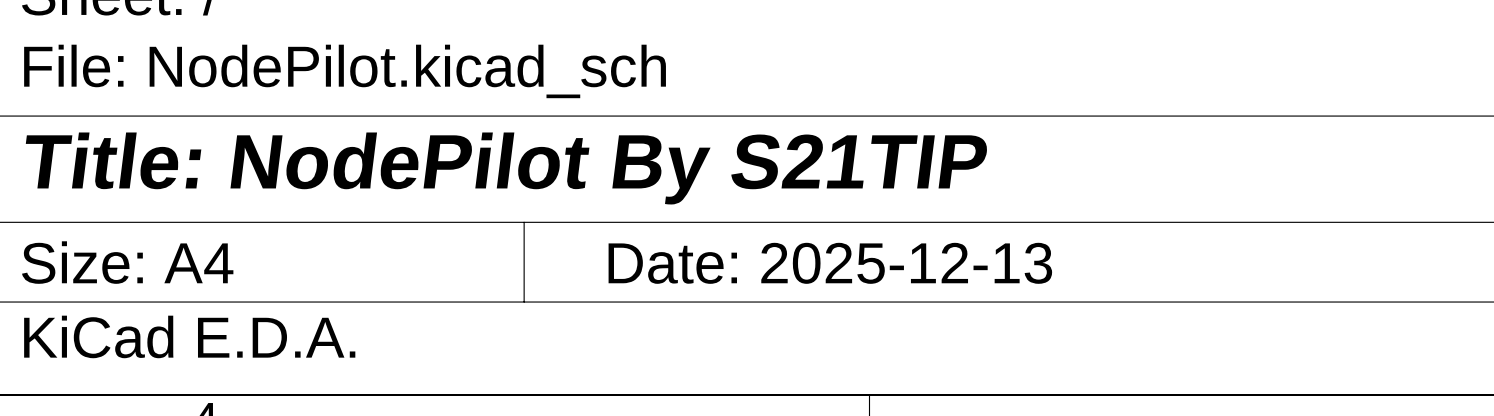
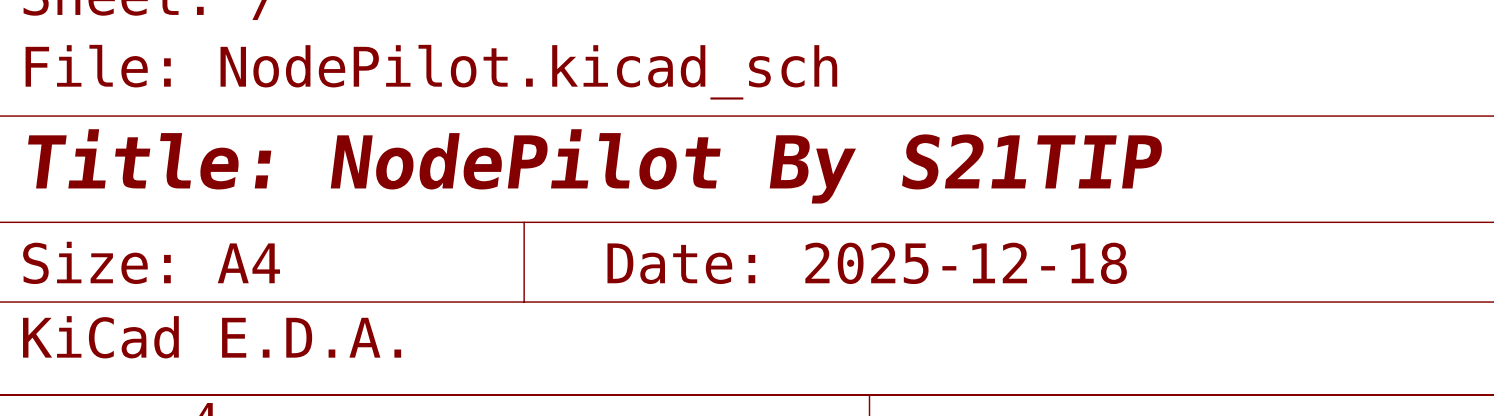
title block: Date: 2025-12-13 (830, 263) -> Date: 2025-12-18 (867, 263)

